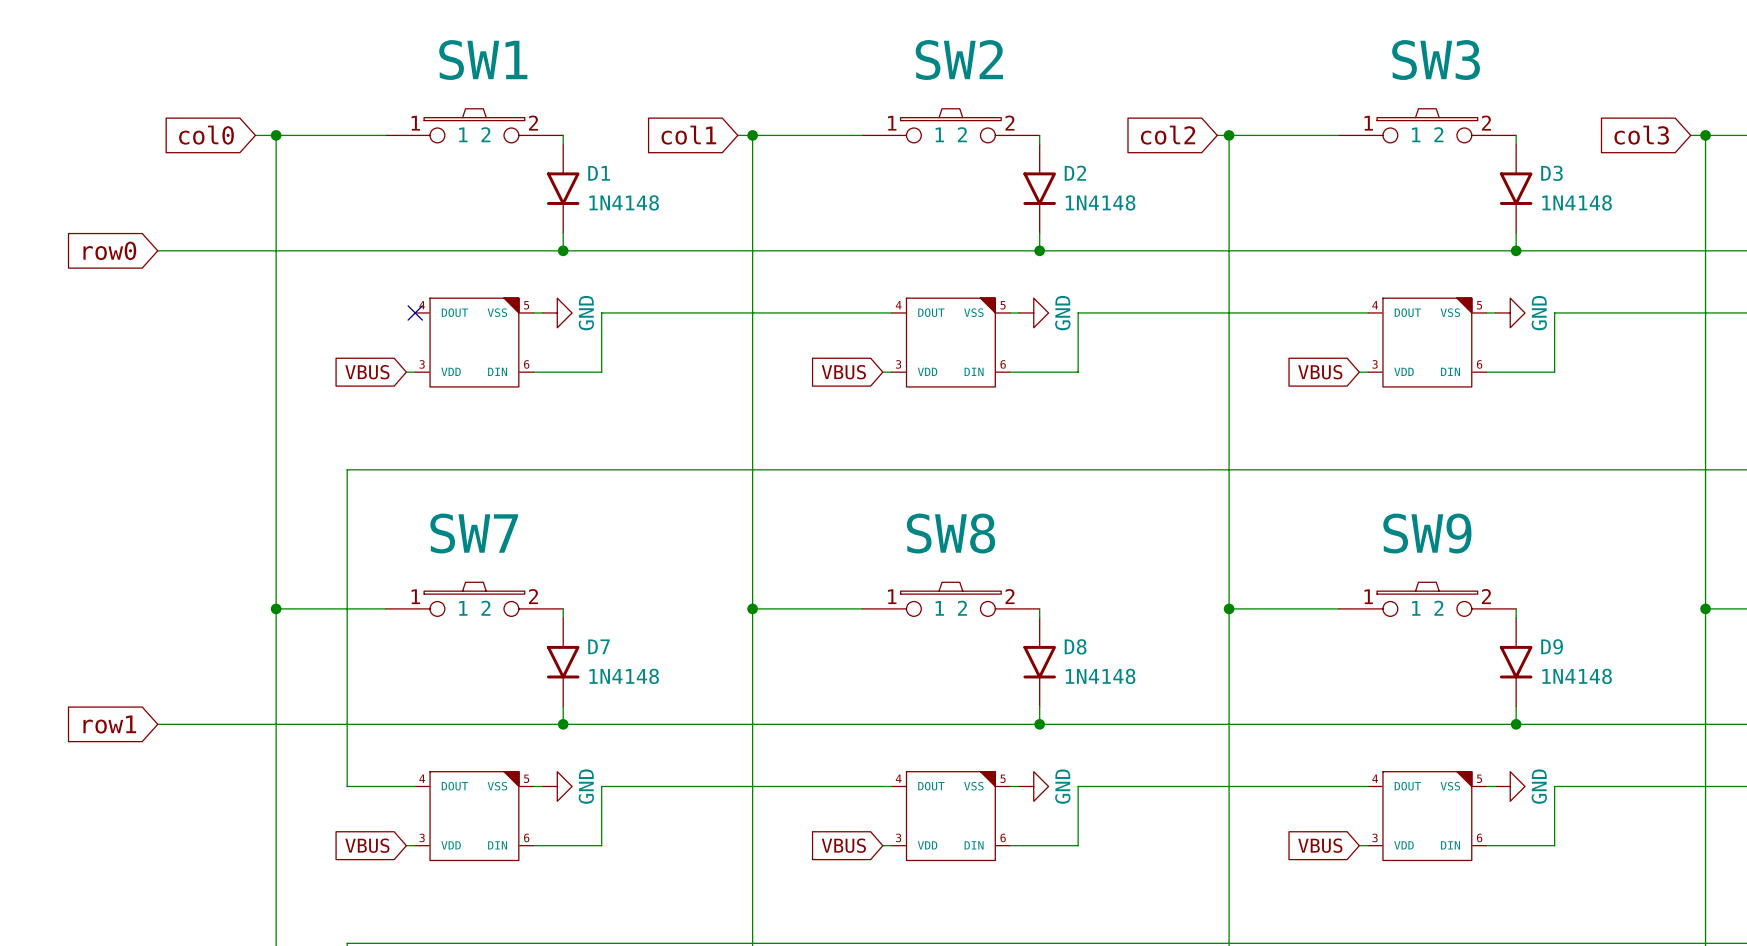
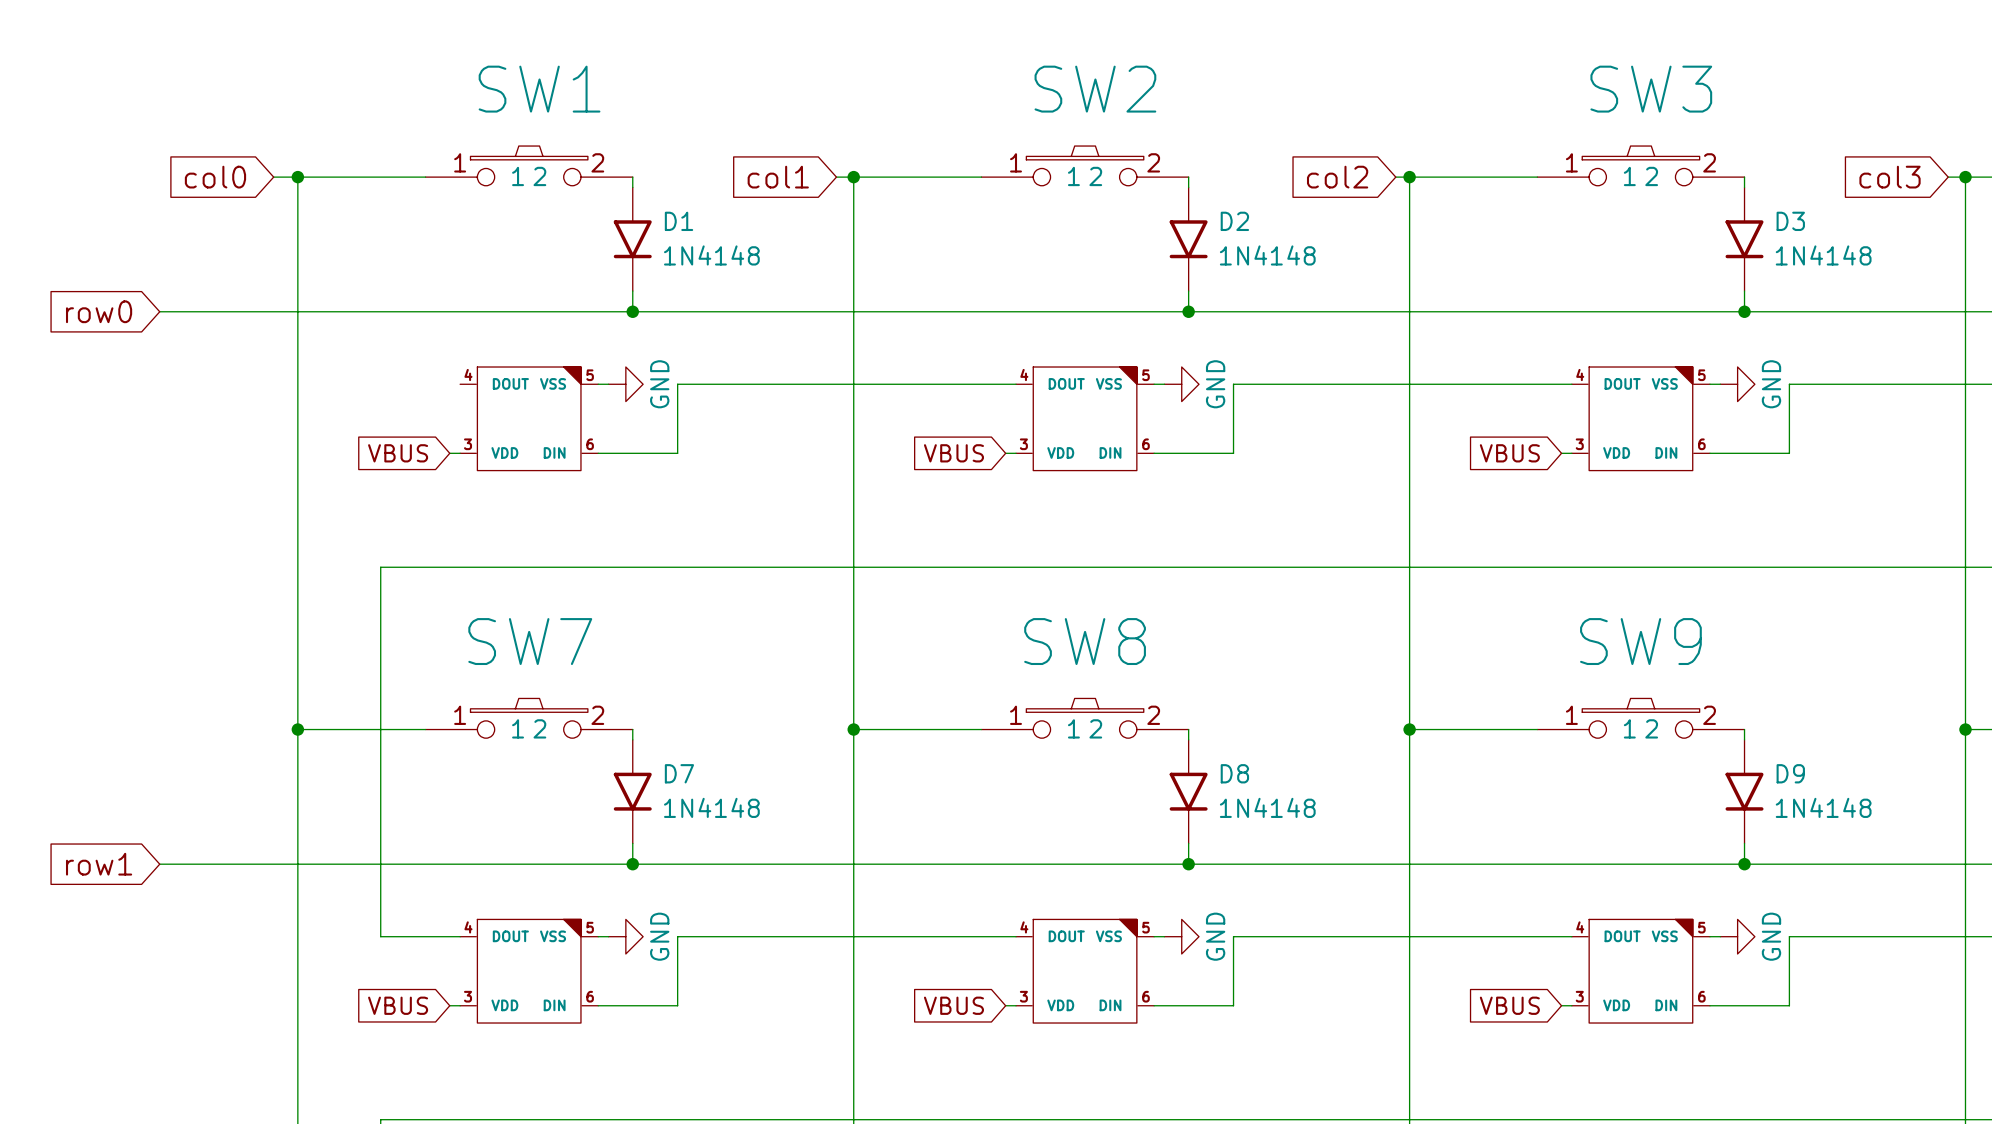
no-connect mark: (415, 312) -> none

